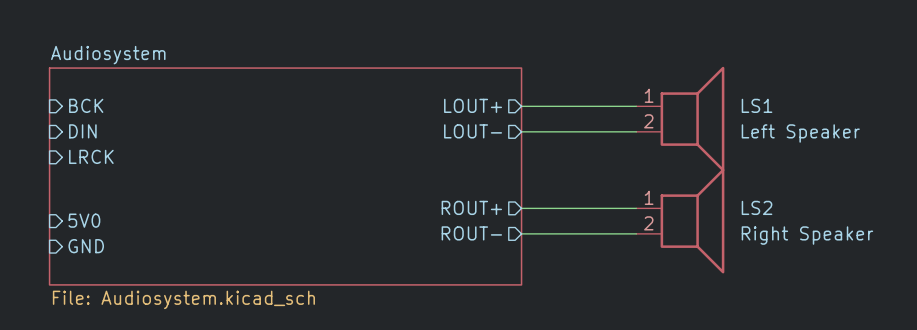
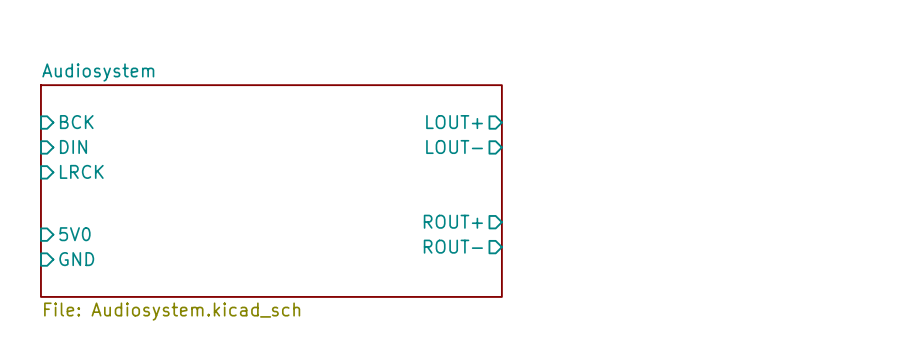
wire: (521, 106) (636, 106) -> none
LS1: Left Speaker (680, 119) -> none
wire: (521, 131) (636, 131) -> none
wire: (521, 208) (636, 208) -> none
LS2: Right Speaker (680, 221) -> none
wire: (521, 233) (636, 233) -> none

